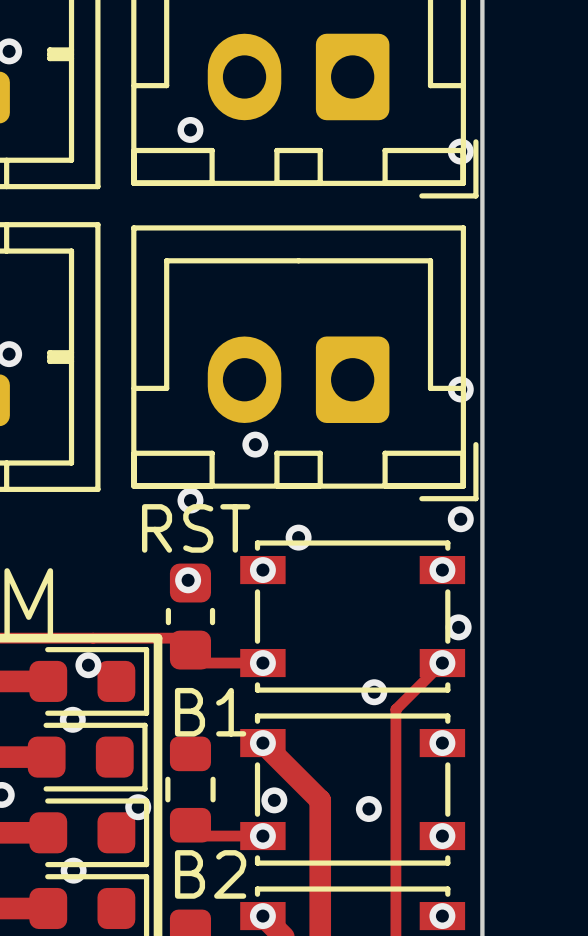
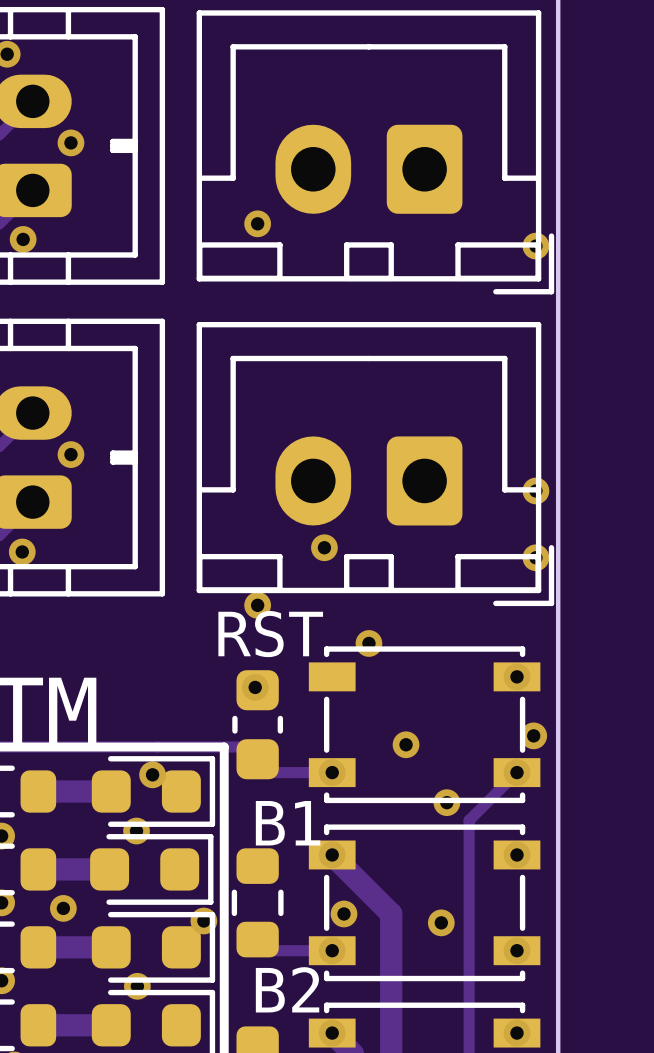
via position: (460, 519) -> (535, 557)
via: (262, 570) -> none
via: none -> (406, 744)

